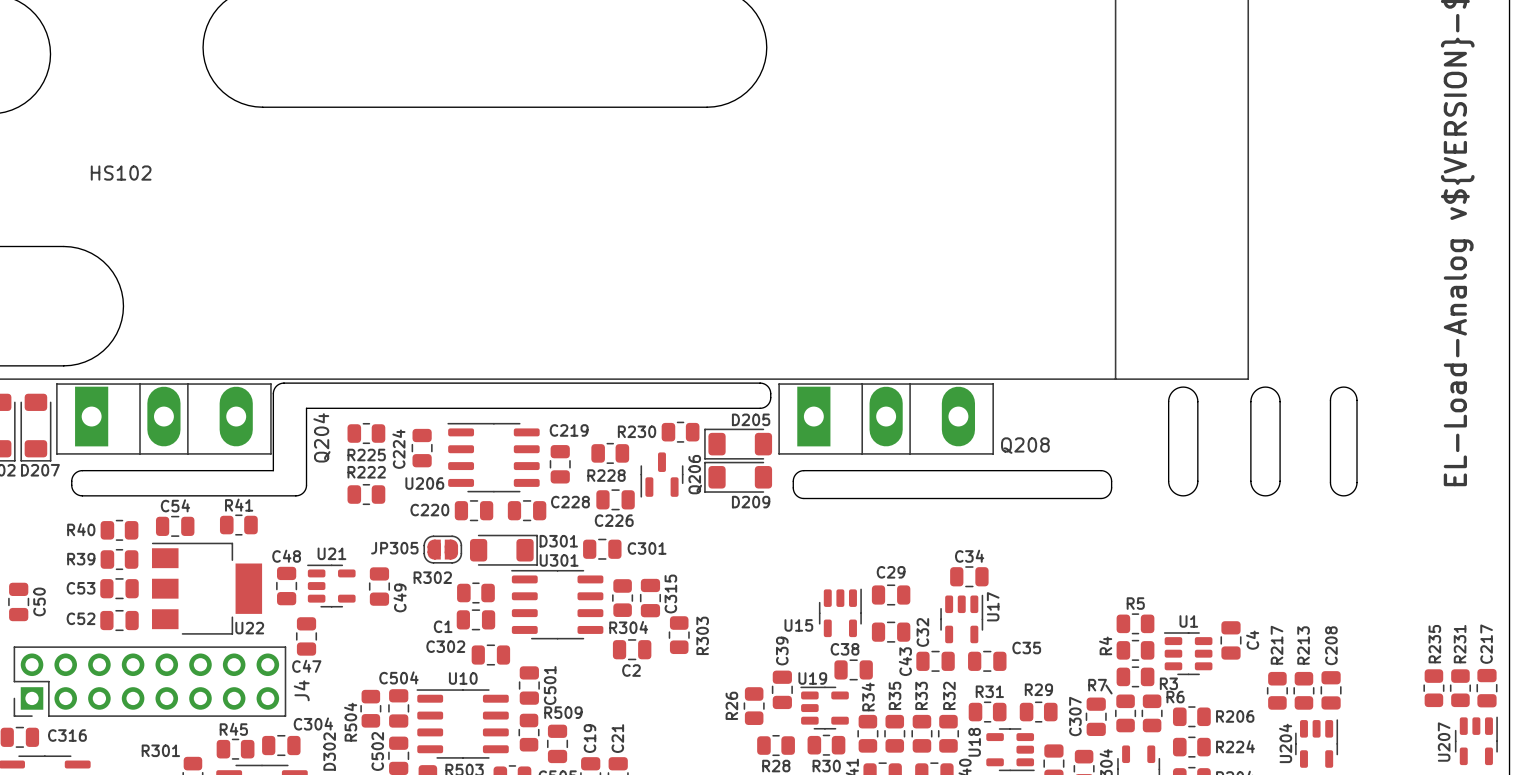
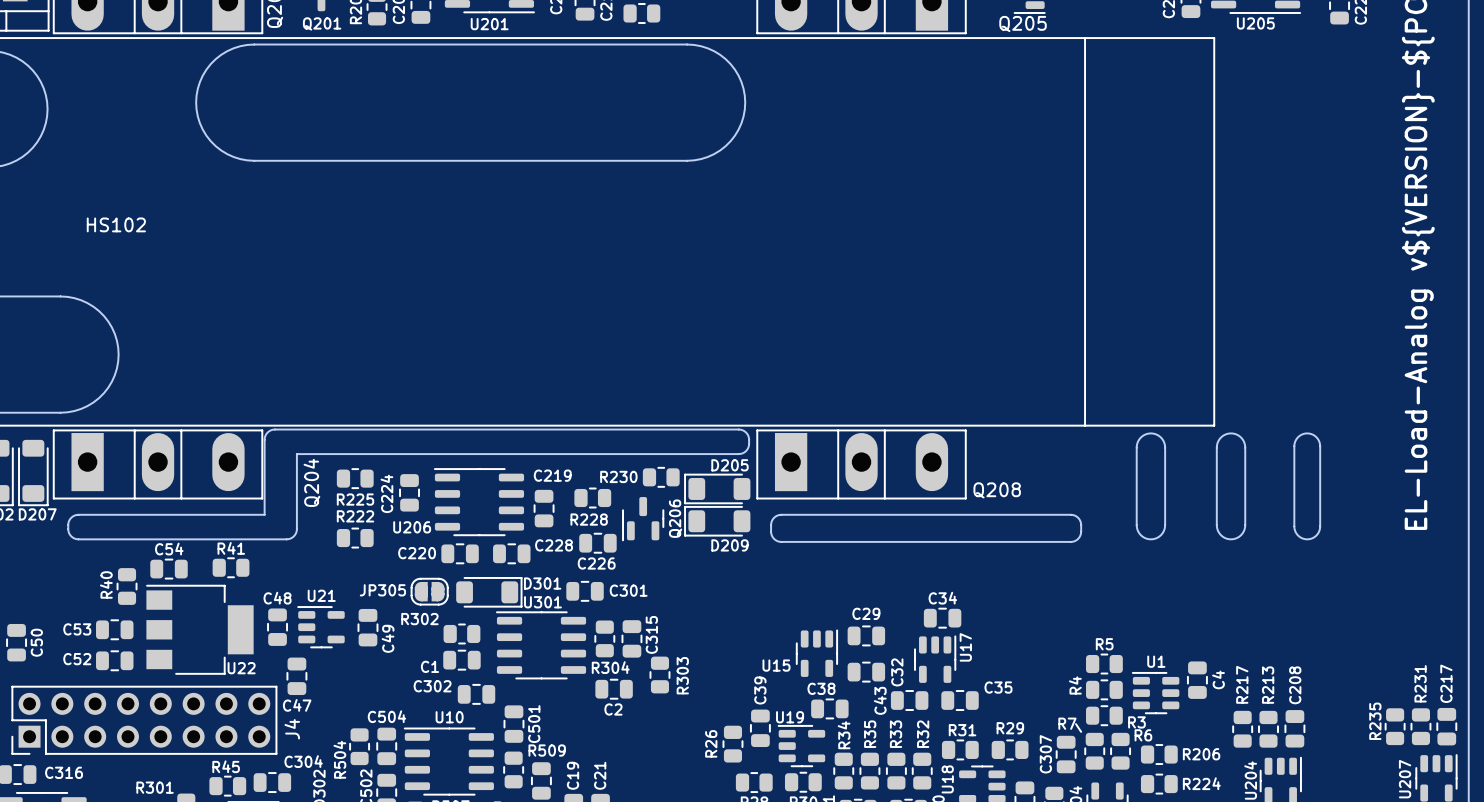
R40 rotation: 0° (119, 530) -> 90° clockwise (127, 586)
R39: (119, 559) -> none
R235 name position: R235 (1434, 644) -> R235 (1375, 721)

